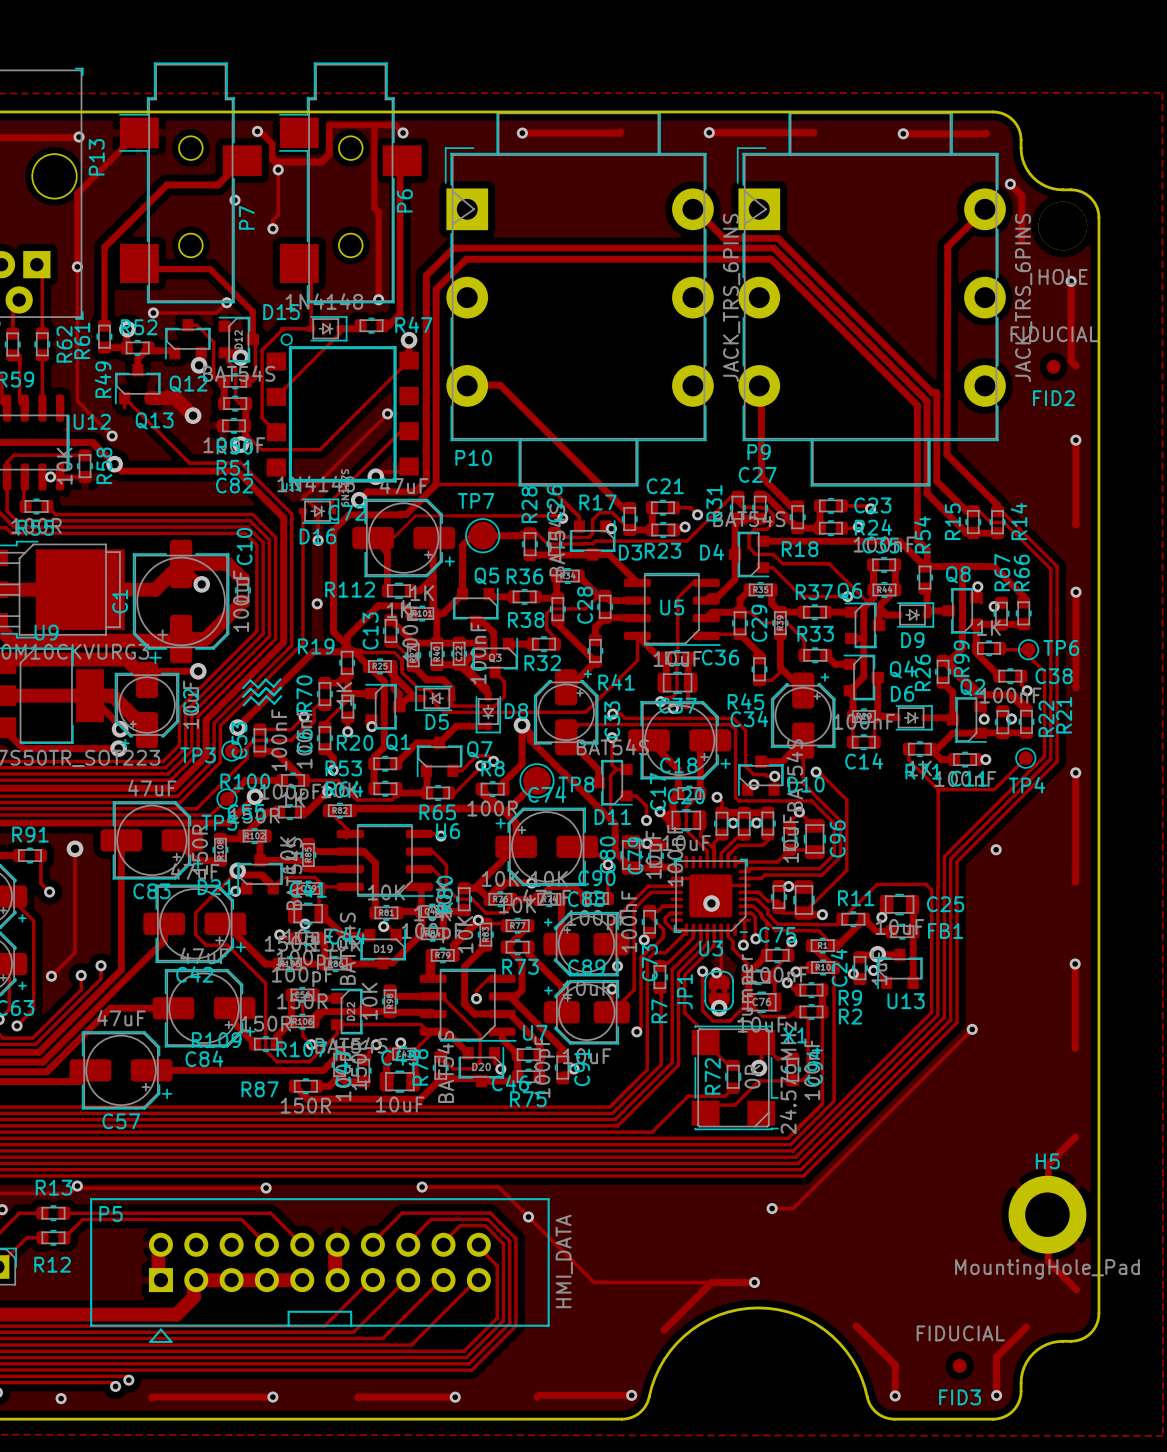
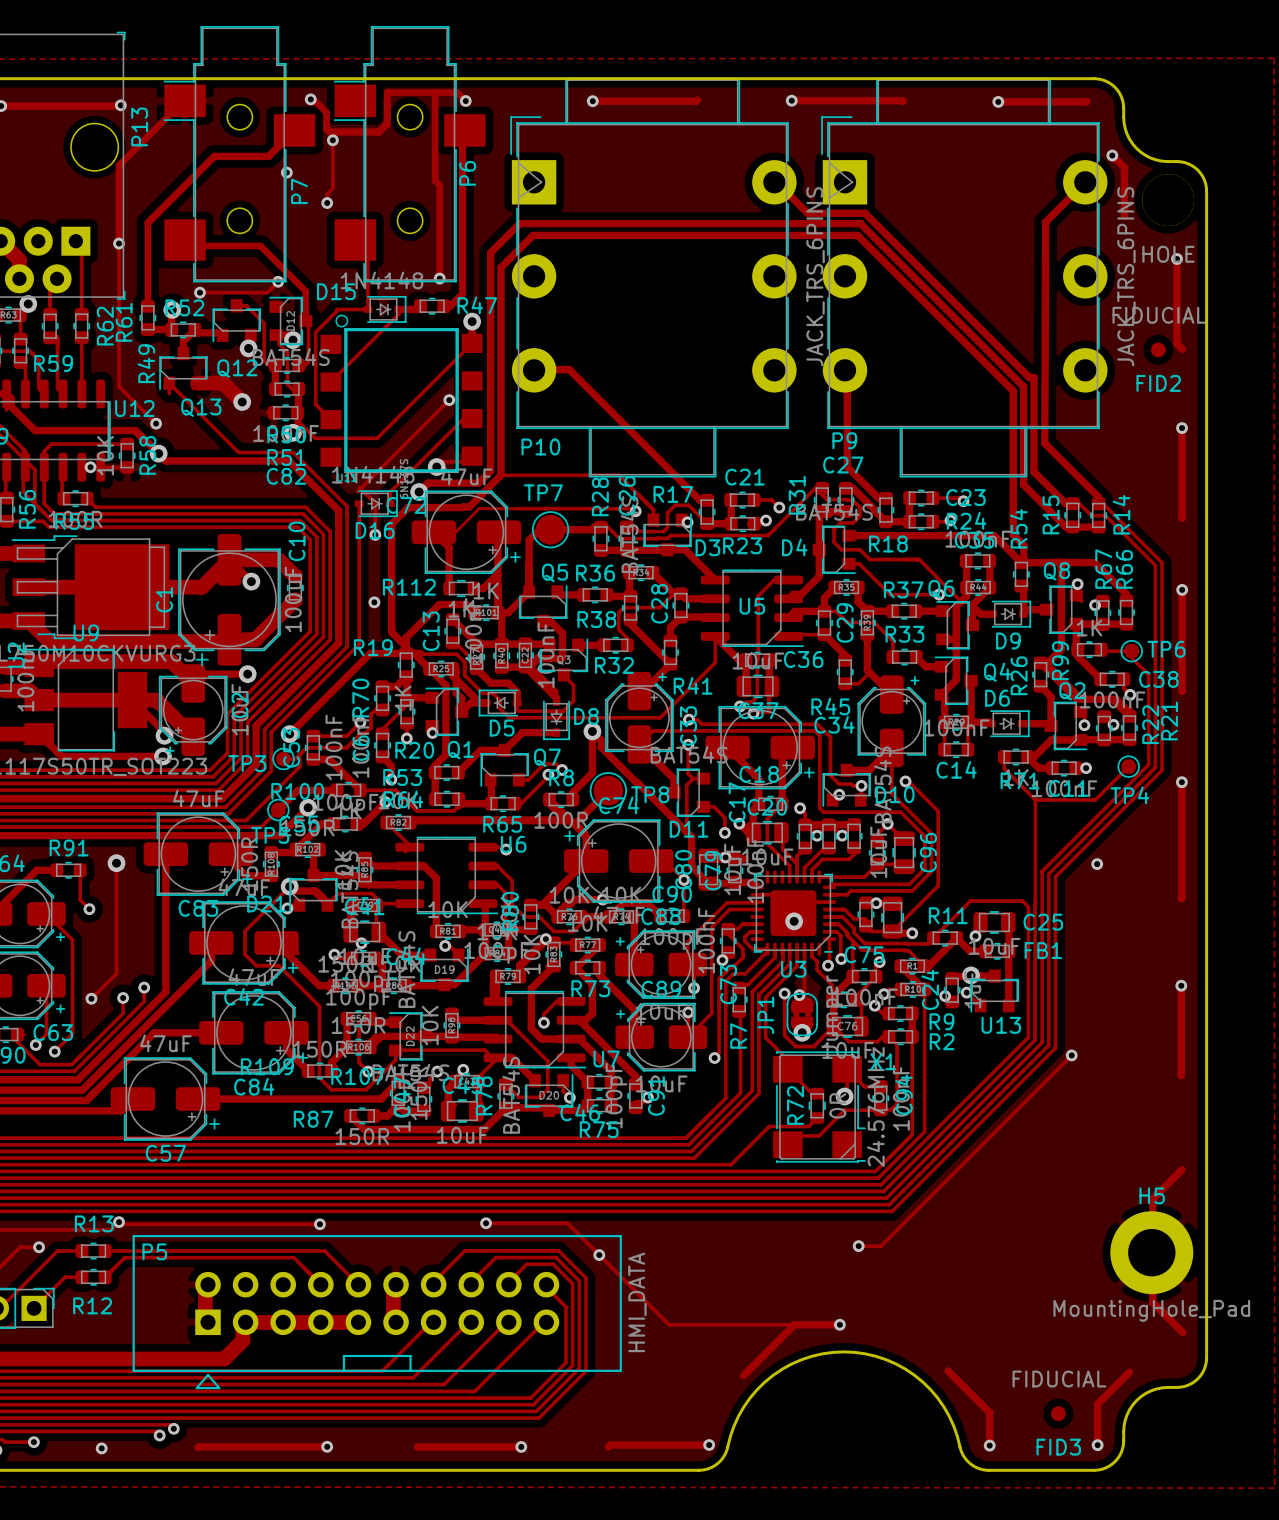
line: (280, 679) (273, 686) (265, 679) (258, 687) (250, 680) (242, 688) -> none
line: (280, 687) (274, 695) (266, 688) (258, 696) (250, 688) (243, 696) -> none
line: (281, 696) (274, 703) (266, 696) (259, 704) (251, 697) (243, 705) -> none

